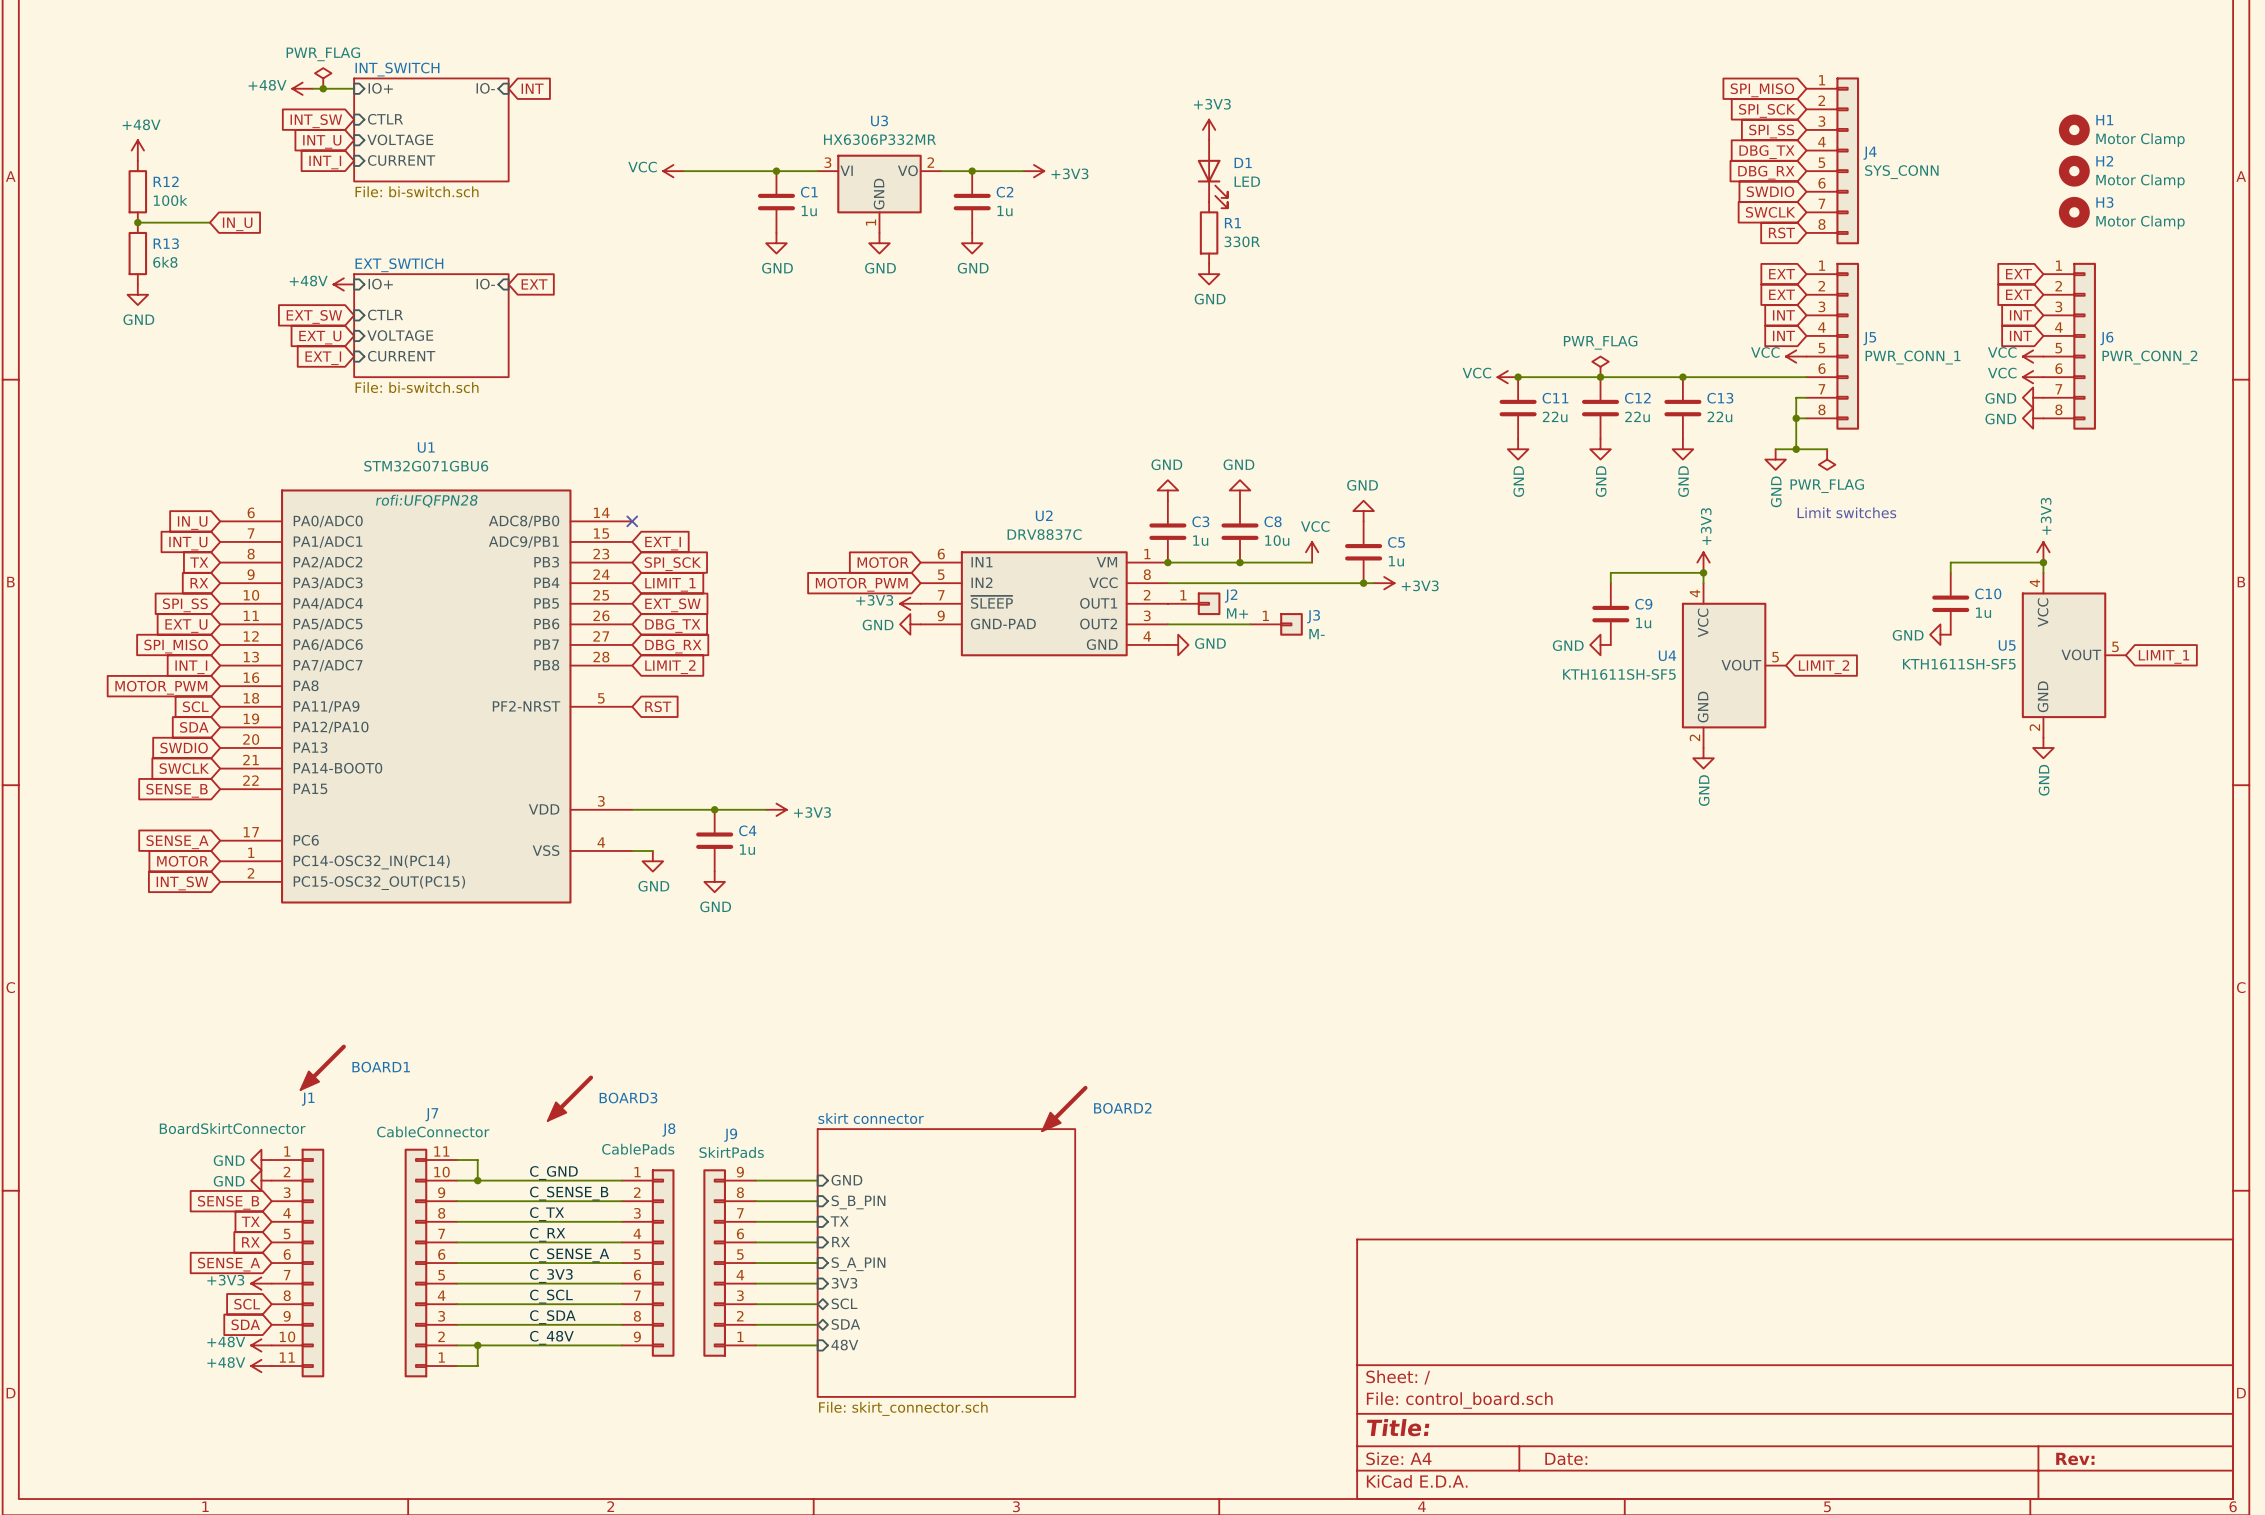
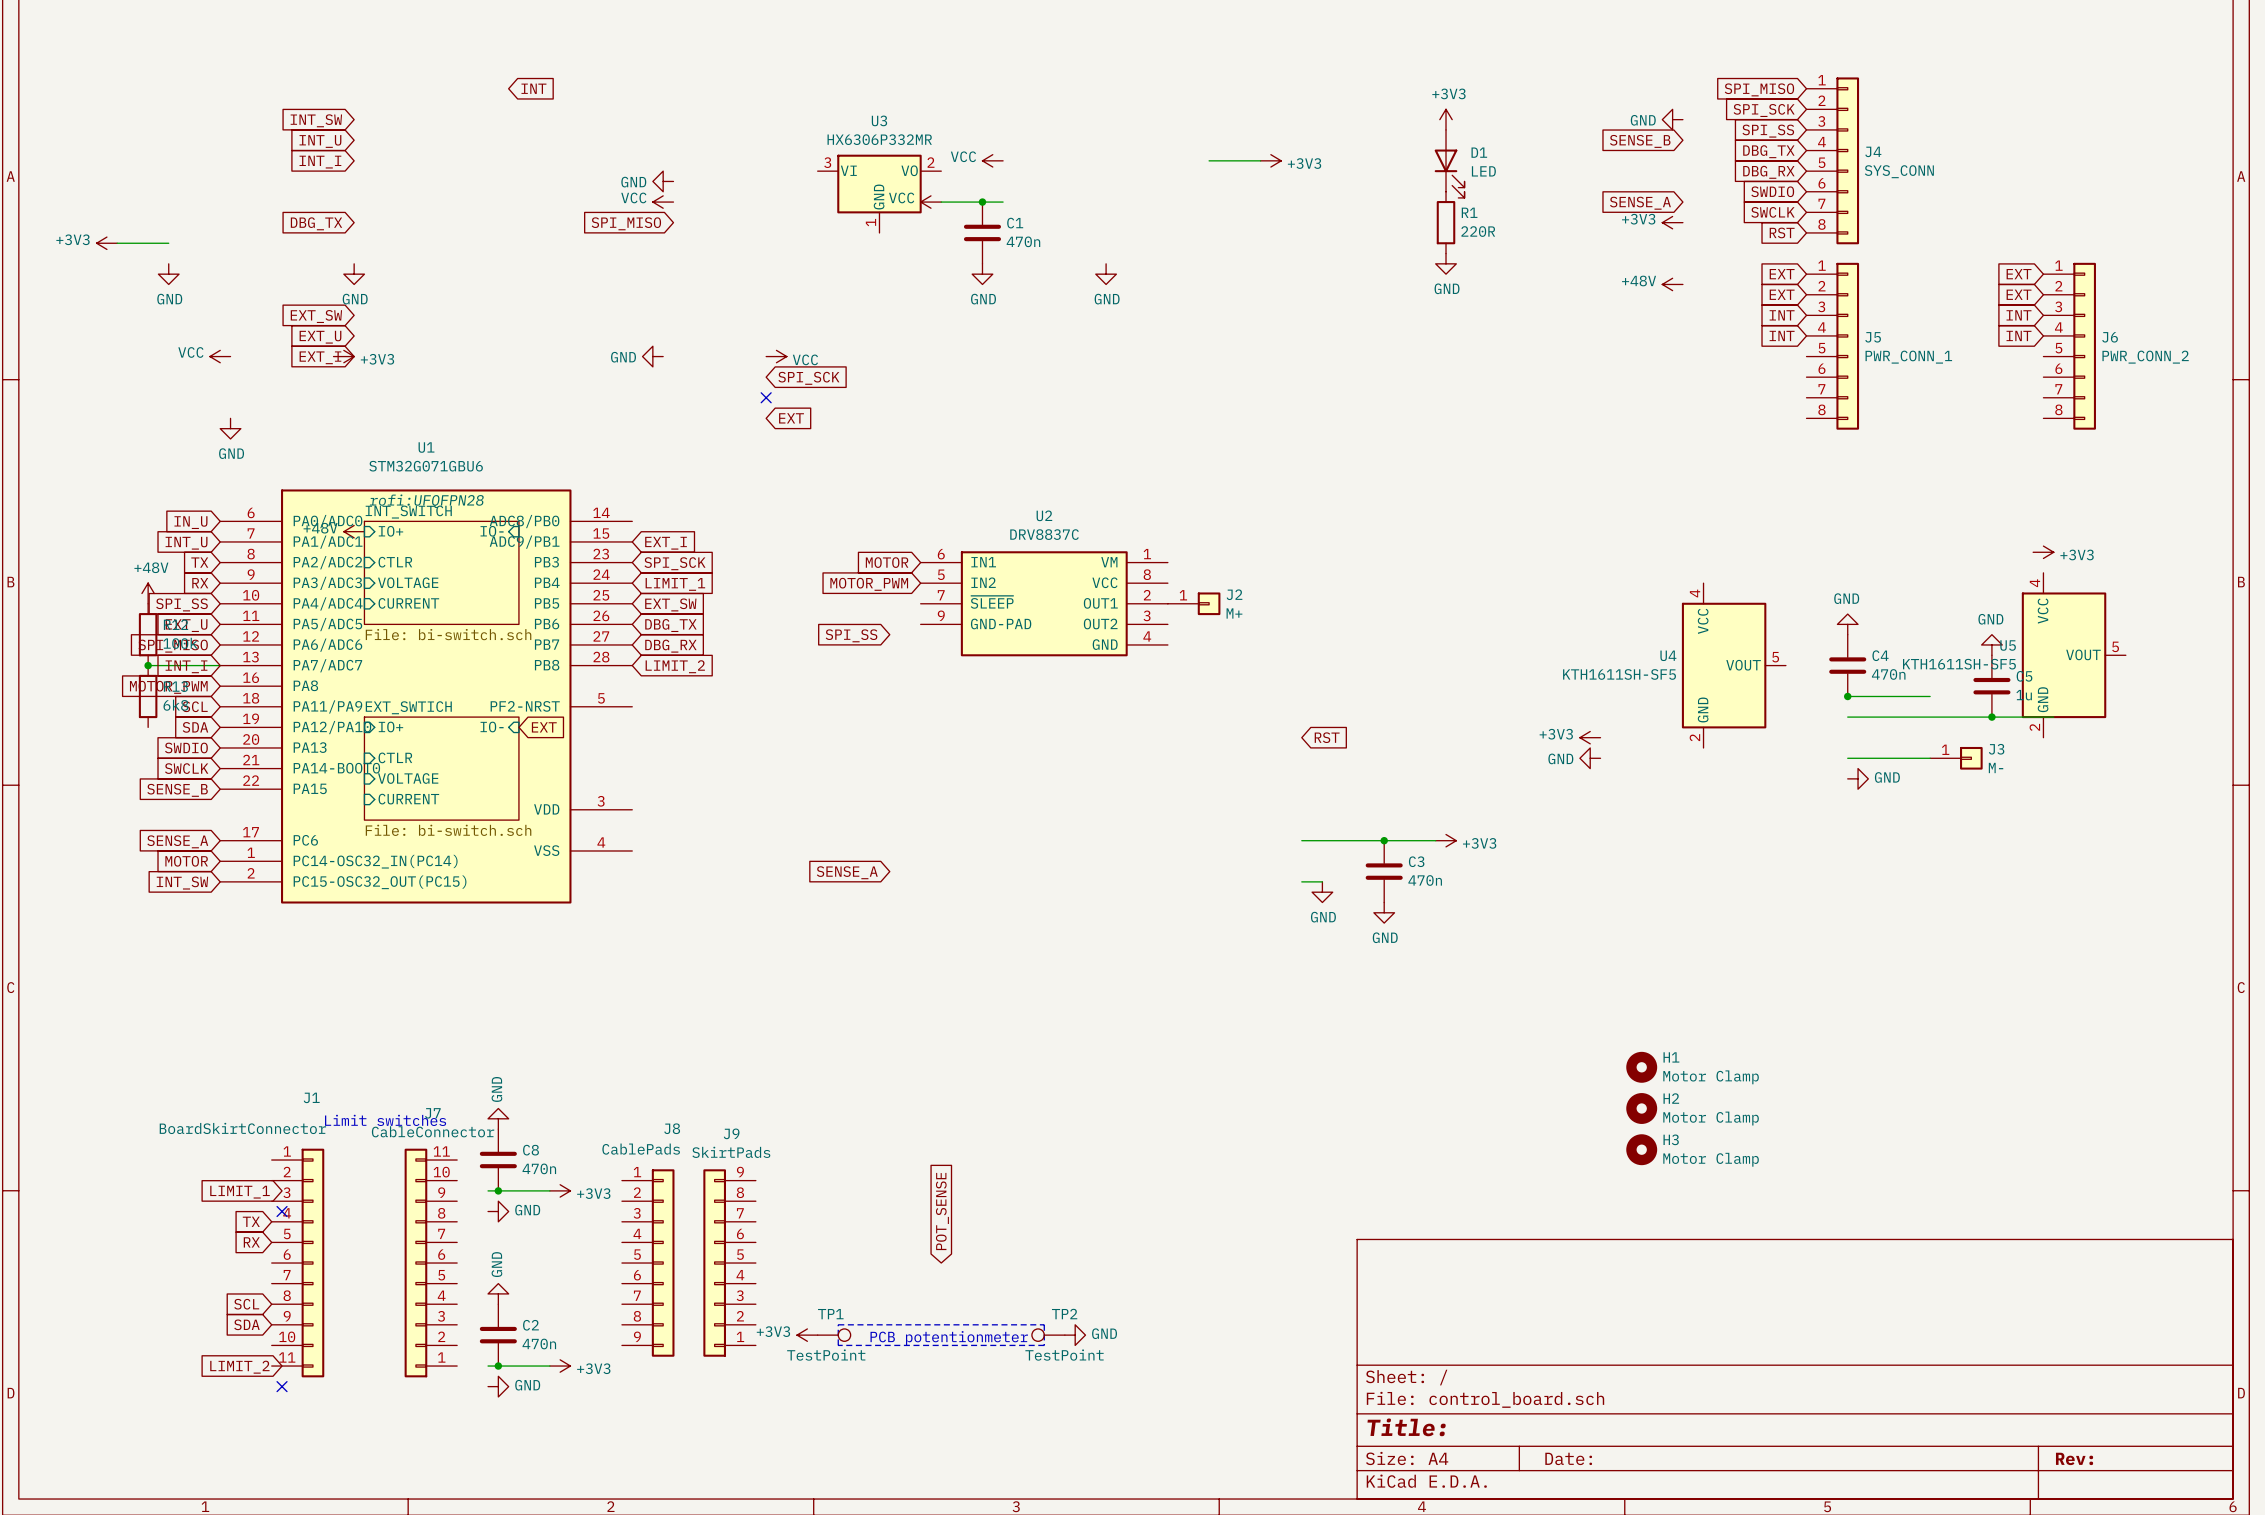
power symbol: PWR_FLAG (323, 78) -> none
power symbol: +48V (302, 88) -> none
wire: (312, 88) (354, 88) -> none
junction: (323, 88) -> none
sheet pin: IO+ (380, 88) -> none
sheet pin: IO- (485, 88) -> none
sheet pin: CTLR (385, 119) -> none
power symbol: none -> +3V3 (1446, 119)
power symbol: none -> GND (1672, 119)
sheet INT_SWITCH: File: bi-switch.sch (431, 129) -> none
power symbol rotation: 0° (1209, 129) -> 90° clockwise (1270, 160)
power symbol position: +3V3 (1209, 129) -> +3V3 (1270, 160)
H1 position: (2074, 129) -> (1641, 1067)
sheet pin: VOLTAGE (400, 139) -> none
global label: none -> SENSE_B (1640, 141)
power symbol: +48V (137, 150) -> none
sheet pin: CURRENT (401, 160) -> none
power symbol: none -> VCC (992, 160)
wire: none -> (1209, 160) (1260, 160)
power symbol position: VCC (673, 171) -> VCC (663, 202)
wire: (683, 171) (817, 171) -> none
junction: (776, 171) -> none
wire: (941, 171) (1023, 171) -> none
junction position: (972, 171) -> (982, 202)
power symbol: +3V3 (1033, 171) -> none
H2 position: (2074, 171) -> (1641, 1108)
D1 position: (1212, 174) -> (1449, 163)
power symbol: none -> GND (663, 181)
R12 position: (137, 191) -> (148, 634)
C1 position: (776, 202) -> (982, 232)
power symbol: none -> VCC (930, 202)
wire: none -> (941, 202) (1003, 202)
C2 position: (972, 202) -> (498, 1335)
global label: none -> SENSE_A (1640, 203)
C1 value: 1u (809, 211) -> 470n (1023, 241)
C2 value: 1u (1004, 211) -> 470n (539, 1344)
H3 position: (2074, 212) -> (1641, 1149)
wire: (137, 222) (209, 222) -> none
junction: (137, 222) -> none
power symbol: none -> +3V3 (1672, 222)
global label: IN_U (237, 224) -> none
global label: none -> DBG_TX (316, 223)
global label: none -> SPI_MISO (626, 223)
R1 position: (1209, 232) -> (1446, 222)
R1 value: 330R (1242, 241) -> 220R (1478, 231)
power symbol: none -> +3V3 (106, 243)
wire: none -> (117, 243) (168, 243)
power symbol: GND (776, 243) -> none
power symbol: GND (879, 243) -> none
power symbol position: GND (972, 243) -> GND (982, 274)
R13 position: (137, 253) -> (148, 696)
power symbol: none -> GND (1446, 263)
power symbol: none -> GND (354, 274)
power symbol: none -> GND (1106, 274)
power symbol: GND (1209, 274) -> none
power symbol: +48V (343, 284) -> none
sheet pin: IO+ (380, 284) -> none
sheet pin: IO- (485, 284) -> none
global label: EXT (534, 284) -> none
power symbol: none -> +48V (1672, 284)
power symbol position: GND (137, 294) -> GND (168, 274)
sheet pin: CTLR (385, 314) -> none
sheet EXT_SWTICH: File: bi-switch.sch (431, 325) -> none
sheet pin: VOLTAGE (400, 335) -> none
power symbol: none -> VCC (220, 356)
power symbol: none -> +3V3 (343, 356)
sheet pin: CURRENT (401, 356) -> none
power symbol: none -> GND (652, 356)
power symbol: none -> VCC (776, 356)
power symbol: VCC (1796, 356) -> none
power symbol: VCC (2033, 356) -> none
power symbol: PWR_FLAG (1600, 366) -> none
power symbol: VCC (1507, 377) -> none
wire: (1518, 377) (1806, 377) -> none
junction: (1518, 377) -> none
junction: (1600, 377) -> none
junction: (1682, 377) -> none
power symbol: VCC (2033, 377) -> none
global label: none -> SPI_SCK (808, 378)
no-connect mark: none -> (766, 397)
wire: (1806, 397) (1796, 397) (1796, 449) -> none
power symbol: GND (2033, 397) -> none
C11: 22u (1518, 408) -> none
C12: 22u (1600, 408) -> none
C13: 22u (1682, 408) -> none
global label: none -> EXT (791, 418)
wire: (1796, 418) (1806, 418) -> none
junction: (1796, 418) -> none
power symbol: GND (2033, 418) -> none
power symbol: none -> GND (230, 428)
power symbol: GND (1518, 449) -> none
power symbol: GND (1600, 449) -> none
power symbol: GND (1682, 449) -> none
wire: (1775, 449) (1827, 449) -> none
junction: (1796, 449) -> none
power symbol: GND (1775, 459) -> none
power symbol: PWR_FLAG (1827, 459) -> none
power symbol: GND (1167, 490) -> none
power symbol: GND (1239, 490) -> none
power symbol: GND (1363, 511) -> none
text: Limit switches (1846, 512) -> none
no-connect mark: (632, 521) -> none
power symbol: none -> +48V (354, 531)
sheet pin: none -> IO+ (390, 531)
sheet pin: none -> IO- (492, 531)
C3 position: (1167, 531) -> (1384, 871)
C8 position: (1239, 531) -> (498, 1160)
C3 value: 1u (1200, 540) -> 470n (1425, 880)
C8 value: 10u (1277, 540) -> 470n (539, 1168)
power symbol: VCC (1312, 552) -> none
C5 position: (1363, 552) -> (1991, 686)
power symbol rotation: 0° (2043, 552) -> 90° clockwise (2043, 552)
sheet pin: none -> CTLR (395, 562)
wire: (1167, 562) (1312, 562) -> none
junction: (1167, 562) -> none
junction: (1239, 562) -> none
power symbol: +3V3 (1703, 562) -> none
junction: (2043, 562) -> none
sheet INT_SWITCH: none -> File: bi-switch.sch (441, 572)
junction: (1703, 572) -> none
wire: (1950, 572) (1950, 562) (2043, 562) (2043, 572) -> none
sheet pin: none -> VOLTAGE (408, 582)
wire: (1167, 583) (1373, 583) -> none
junction: (1363, 583) -> none
power symbol: +3V3 (1384, 583) -> none
wire: (1610, 583) (1610, 572) (1703, 572) (1703, 583) -> none
power symbol: none -> +48V (148, 593)
sheet pin: none -> CURRENT (408, 603)
power symbol: +3V3 (910, 603) -> none
C10: 1u (1950, 603) -> none
C9: 1u (1610, 614) -> none
power symbol: GND (910, 624) -> none
wire: (1167, 624) (1250, 624) -> none
J3 position: (1276, 624) -> (1956, 758)
power symbol: none -> GND (1847, 624)
power symbol: GND (1940, 634) -> none
global label: none -> SPI_SS (851, 635)
power symbol: GND (1178, 644) -> none
power symbol: GND (1600, 644) -> none
power symbol: none -> GND (1991, 644)
global label: LIMIT_1 (2164, 656) -> none
wire: none -> (148, 665) (220, 665)
junction: none -> (148, 665)
global label: LIMIT_2 (1824, 667) -> none
wire: none -> (1847, 696) (1930, 696)
junction: none -> (1847, 696)
global label: RST (658, 706) -> none
wire: none -> (1847, 717) (2053, 717)
junction: none -> (1991, 717)
sheet pin: none -> IO+ (390, 727)
sheet pin: none -> IO- (492, 727)
global label: none -> EXT (544, 727)
global label: none -> RST (1327, 737)
power symbol: none -> +3V3 (1590, 737)
power symbol: GND (2043, 747) -> none
sheet pin: none -> CTLR (395, 757)
power symbol: none -> GND (1590, 758)
power symbol: GND (1703, 758) -> none
wire: none -> (1847, 758) (1930, 758)
sheet EXT_SWTICH: none -> File: bi-switch.sch (441, 768)
sheet pin: none -> VOLTAGE (408, 778)
power symbol: none -> GND (1858, 778)
sheet pin: none -> CURRENT (408, 799)
wire: (632, 809) (766, 809) -> none
junction: (714, 809) -> none
power symbol: +3V3 (776, 809) -> none
C4 position: (714, 840) -> (1847, 665)
wire: none -> (1301, 840) (1435, 840)
junction: none -> (1384, 840)
power symbol: none -> +3V3 (1446, 840)
C4 value: 1u (747, 849) -> 470n (1888, 674)
wire: (632, 850) (652, 850) -> none
power symbol: GND (652, 861) -> none
global label: none -> SENSE_A (847, 872)
power symbol: GND (714, 881) -> none
wire: none -> (1301, 881) (1322, 881)
power symbol: none -> GND (1322, 892)
power symbol: none -> GND (1384, 912)
BOARD1: (323, 1067) -> none
BOARD3: (570, 1098) -> none
BOARD2: (1064, 1108) -> none
power symbol: none -> GND (498, 1118)
text: none -> Limit switches (385, 1120)
power symbol: GND (261, 1160) -> none
wire: (457, 1160) (477, 1160) (477, 1180) -> none
label: C_GND (553, 1172) -> none
power symbol: GND (261, 1180) -> none
wire: (457, 1180) (621, 1180) -> none
junction position: (477, 1180) -> (498, 1190)
wire: (755, 1180) (817, 1180) -> none
sheet pin: GND (846, 1180) -> none
wire: none -> (488, 1190) (549, 1190)
power symbol: none -> +3V3 (560, 1190)
global label: none -> LIMIT_1 (239, 1192)
label: C_SENSE_B (569, 1193) -> none
wire: (457, 1201) (621, 1201) -> none
wire: (755, 1201) (817, 1201) -> none
global label: SENSE_B (228, 1202) -> none
sheet pin: S_B_PIN (858, 1202) -> none
global label: none -> POT_SENSE (942, 1211)
no-connect mark: none -> (282, 1211)
power symbol: none -> GND (498, 1211)
label: C_TX (547, 1214) -> none
wire: (457, 1221) (621, 1221) -> none
wire: (755, 1221) (817, 1221) -> none
sheet pin: TX (839, 1221) -> none
label: C_RX (547, 1234) -> none
wire: (457, 1242) (621, 1242) -> none
wire: (755, 1242) (817, 1242) -> none
sheet pin: RX (840, 1242) -> none
label: C_SENSE_A (569, 1255) -> none
wire: (457, 1263) (621, 1263) -> none
wire: (755, 1263) (817, 1263) -> none
sheet skirt connector: File: skirt_connector.sch (946, 1263) -> none
global label: SENSE_A (229, 1264) -> none
sheet pin: S_A_PIN (858, 1264) -> none
label: C_3V3 (551, 1275) -> none
power symbol: +3V3 (261, 1283) -> none
wire: (457, 1283) (621, 1283) -> none
wire: (755, 1283) (817, 1283) -> none
sheet pin: 3V3 (844, 1283) -> none
power symbol: none -> GND (498, 1293)
label: C_SCL (551, 1296) -> none
sheet pin: SCL (844, 1303) -> none
wire: (457, 1304) (621, 1304) -> none
wire: (755, 1304) (817, 1304) -> none
label: C_SDA (552, 1317) -> none
wire: (457, 1324) (621, 1324) -> none
wire: (755, 1324) (817, 1324) -> none
line: none -> (838, 1324) (1044, 1324) (1044, 1345) (838, 1345) (838, 1324)
sheet pin: SDA (845, 1324) -> none
power symbol: none -> +3V3 (807, 1335)
TP1: none -> TestPoint (834, 1335)
TP2: none -> TestPoint (1048, 1335)
power symbol: none -> GND (1075, 1335)
label: C_48V (551, 1337) -> none
text: none -> PCB potentionmeter (949, 1338)
power symbol: +48V (261, 1345) -> none
wire: (457, 1345) (621, 1345) -> none
wire: (477, 1345) (477, 1366) (457, 1366) -> none
junction position: (477, 1345) -> (498, 1366)
wire: (755, 1345) (817, 1345) -> none
sheet pin: 48V (844, 1345) -> none
power symbol: +48V (261, 1366) -> none
wire: none -> (488, 1366) (549, 1366)
power symbol: none -> +3V3 (560, 1366)
global label: none -> LIMIT_2 (239, 1367)
no-connect mark: none -> (282, 1386)
power symbol: none -> GND (498, 1386)

